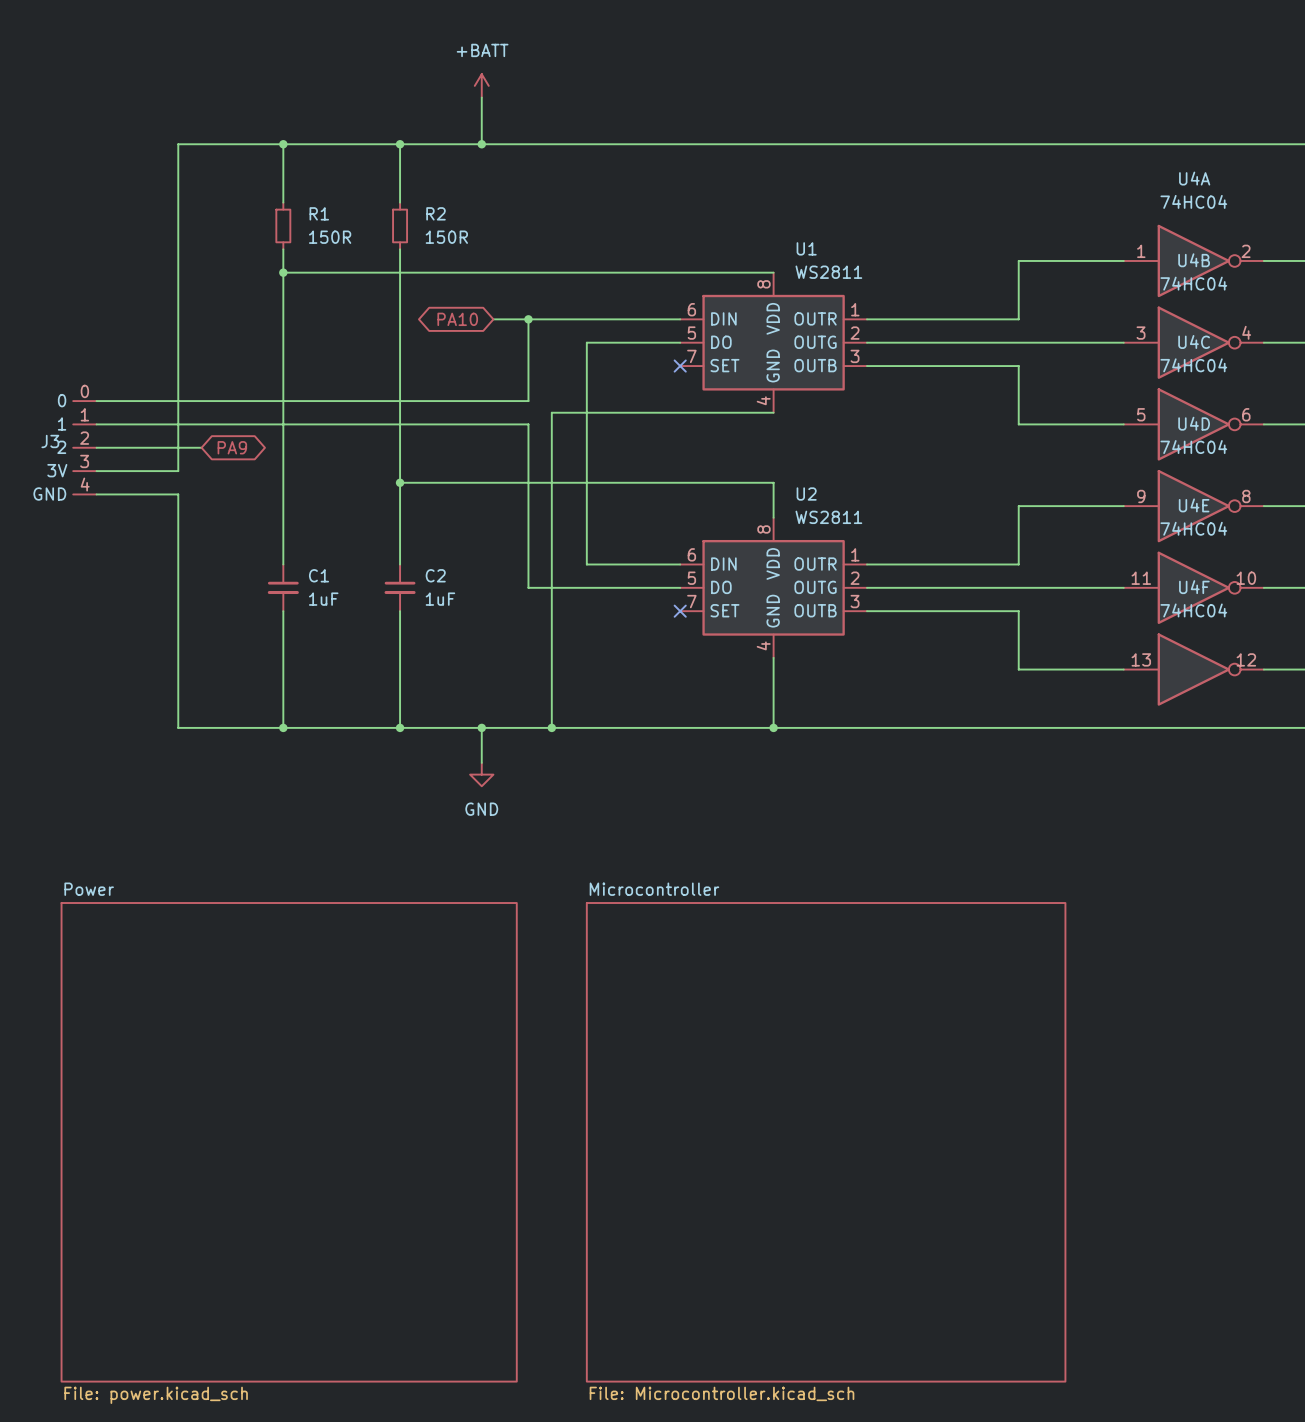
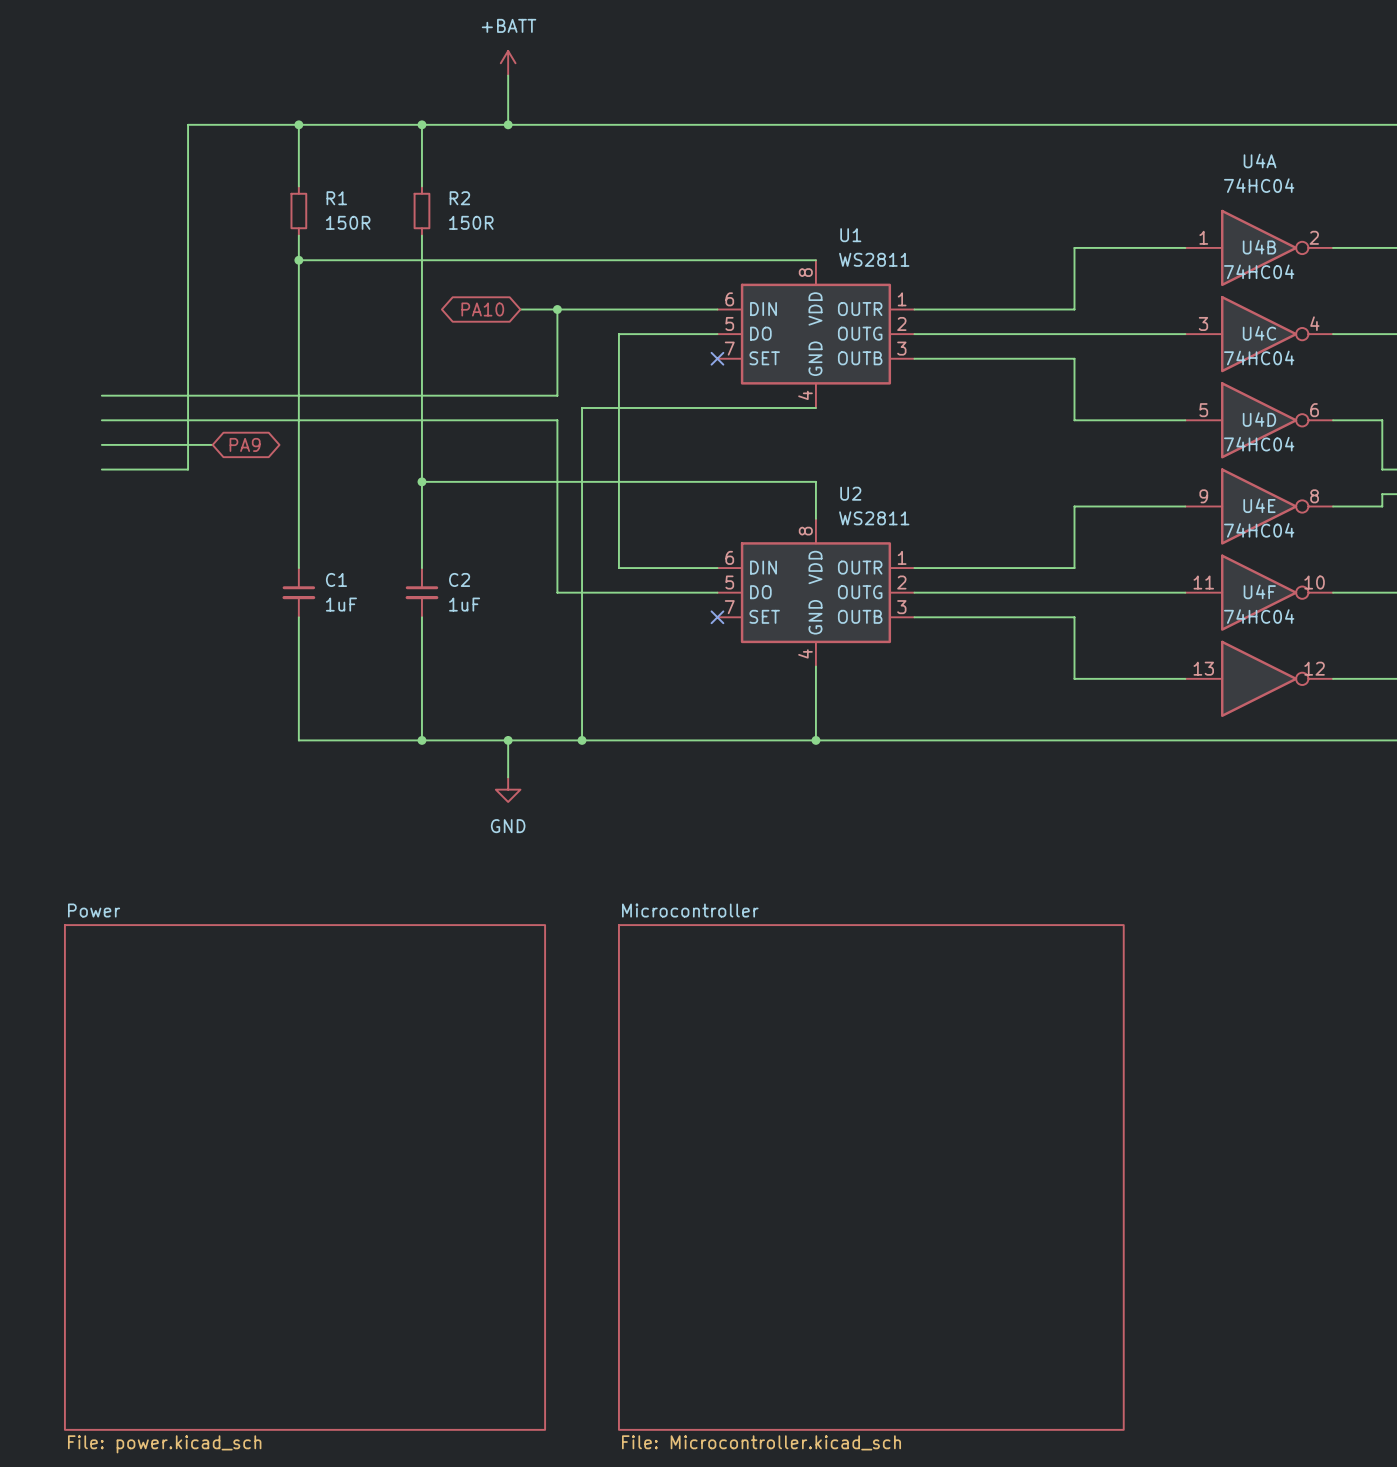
J3: (84, 447) -> none
wire: (96, 494) (178, 494) (178, 727) (283, 727) -> none
junction: (283, 727) -> none

